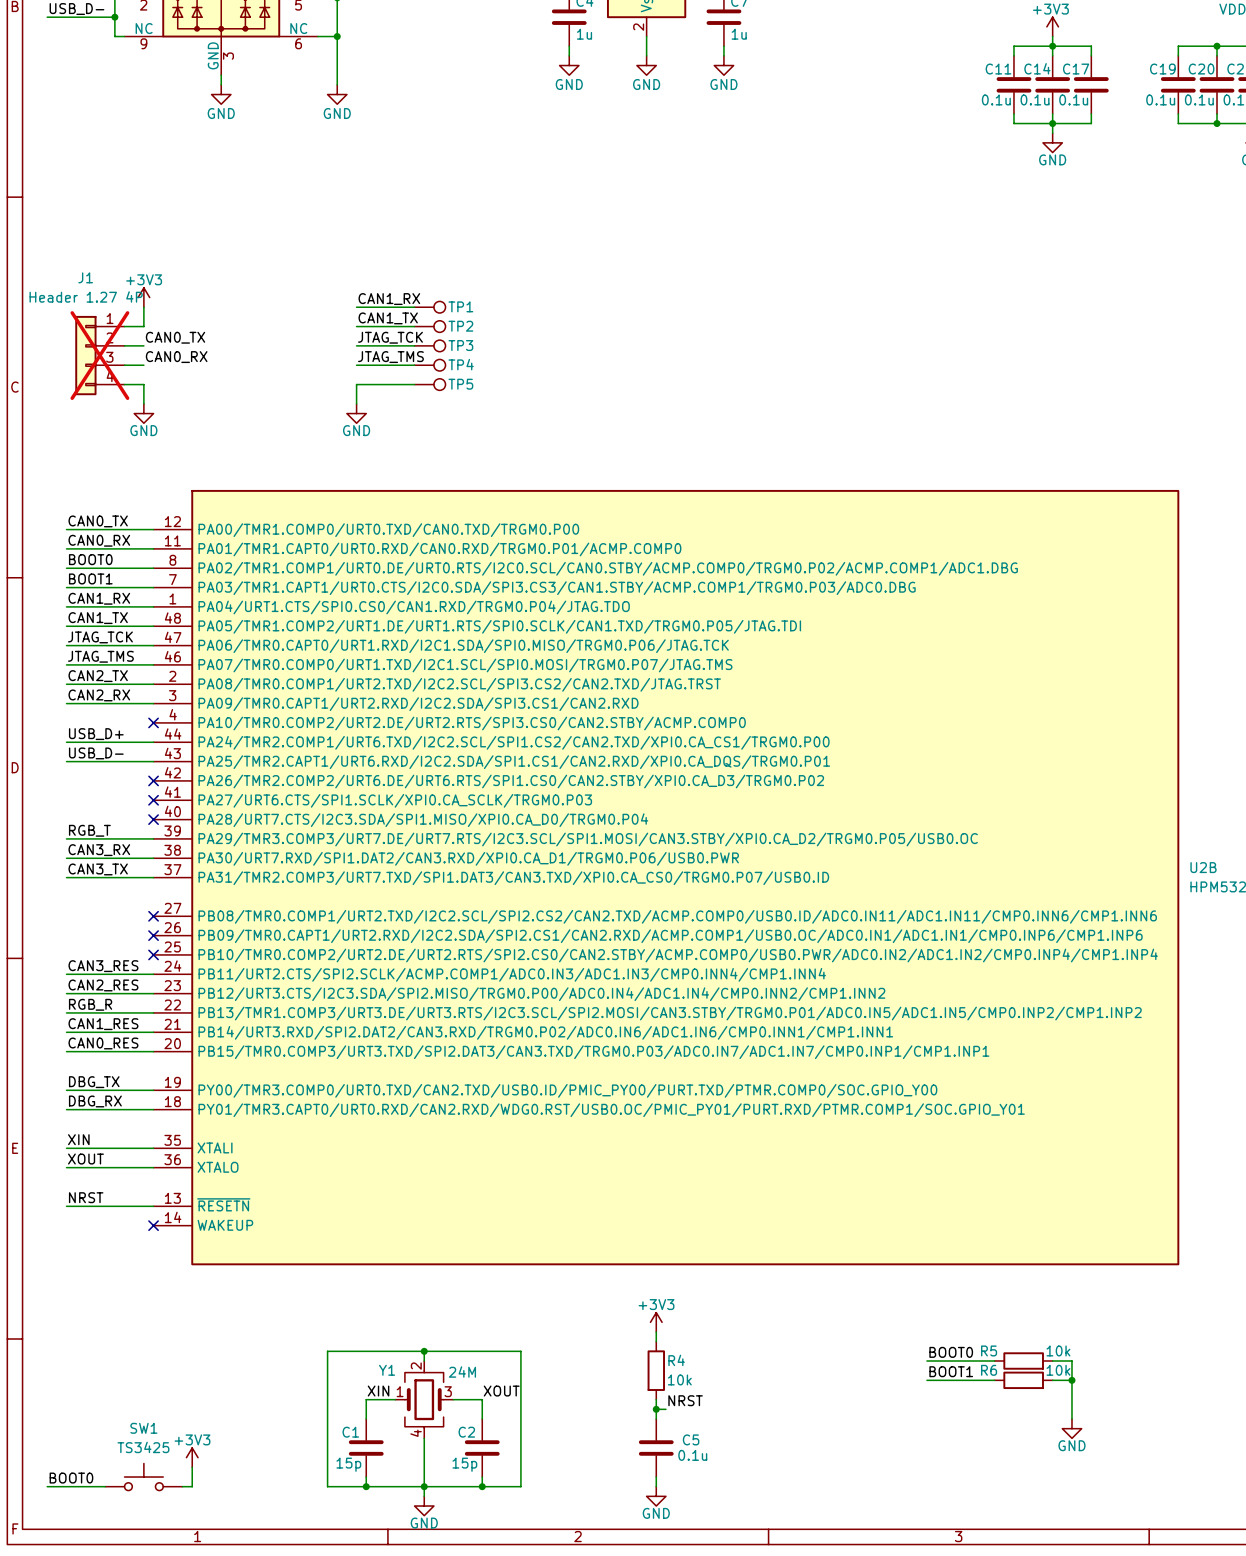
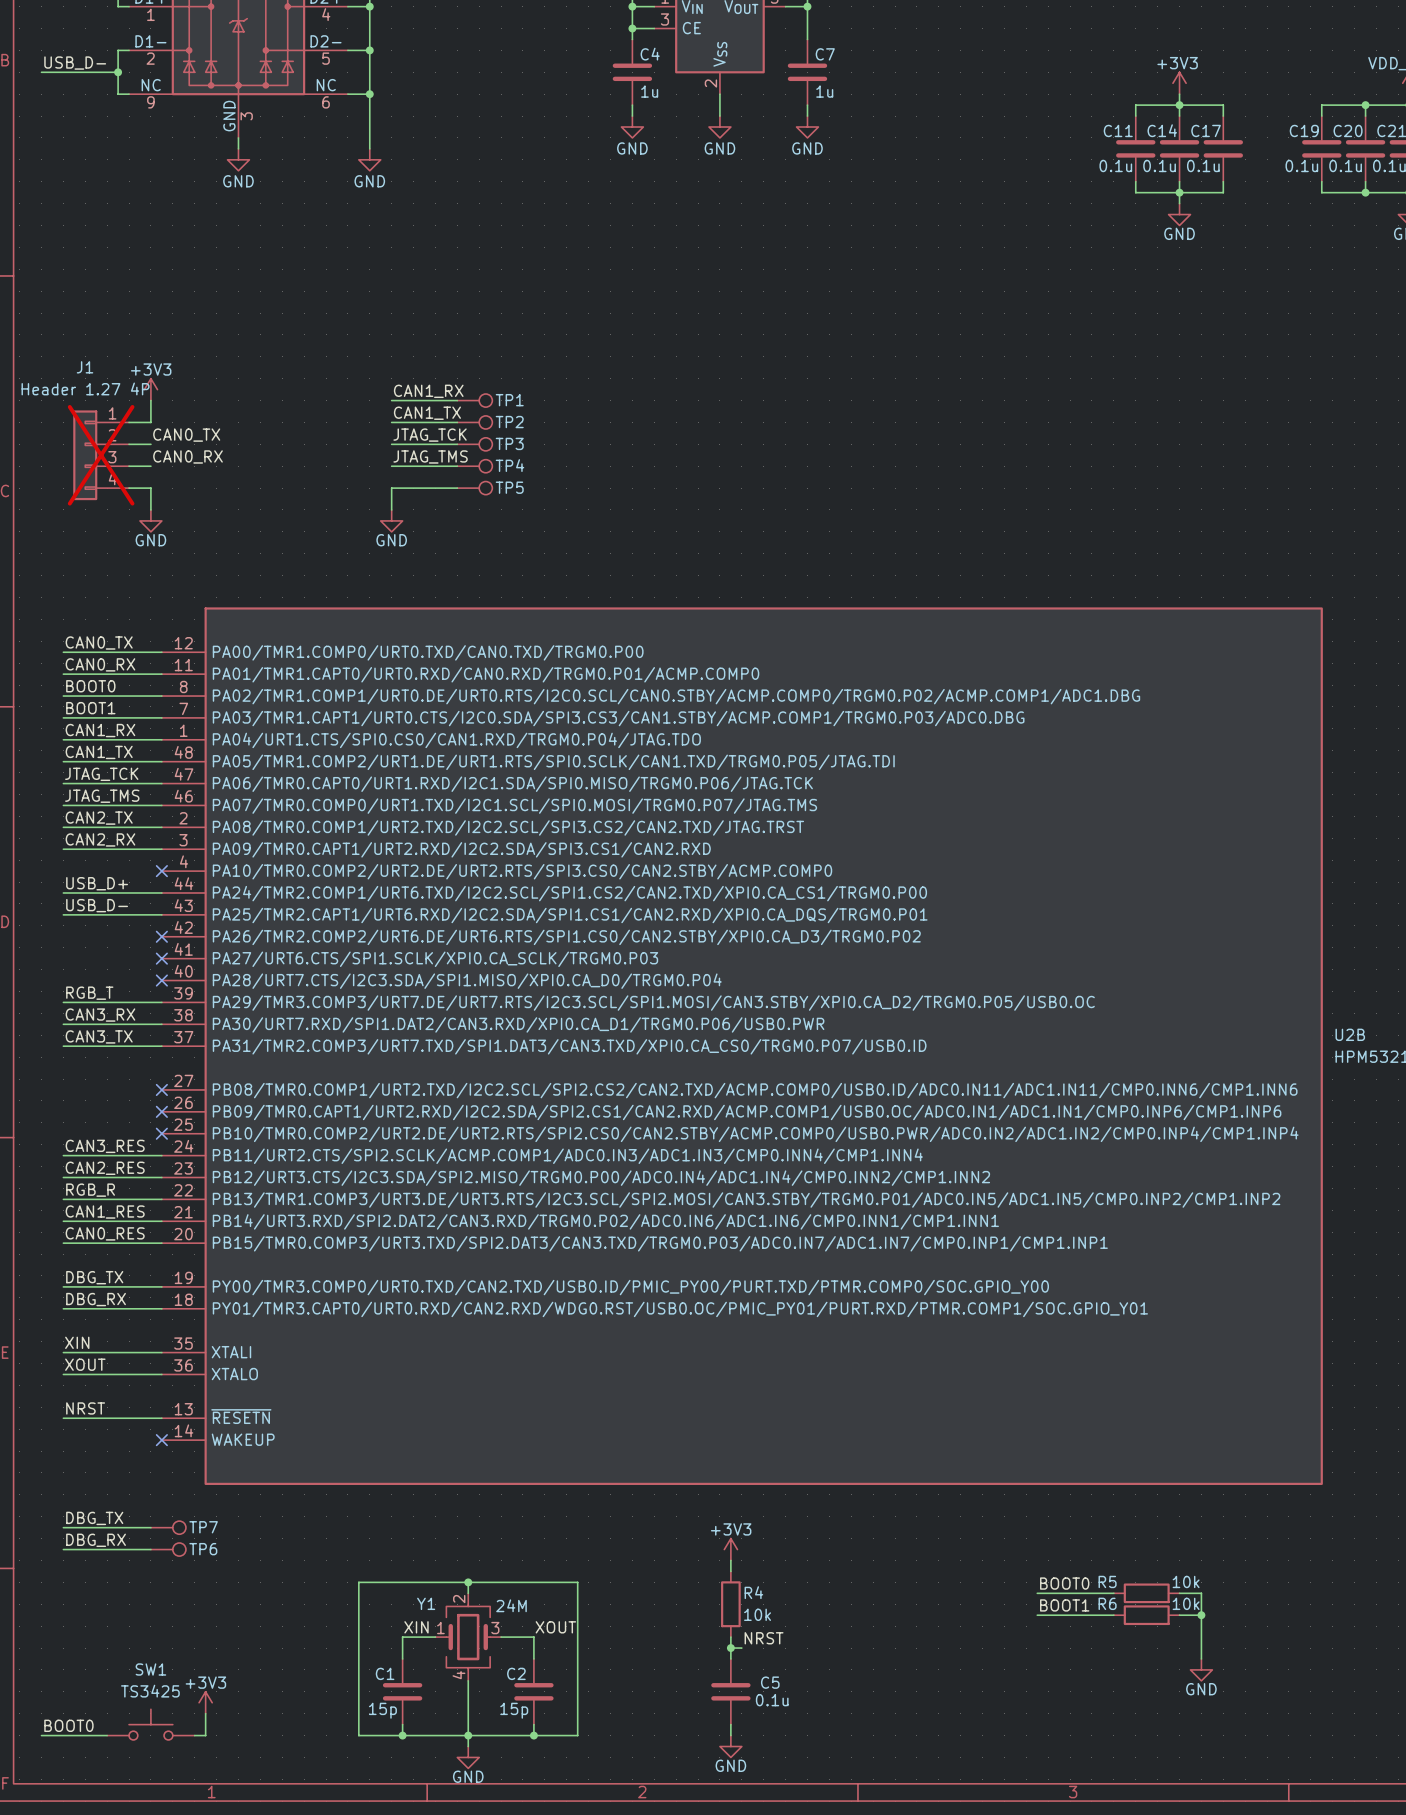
label: none -> DBG_TX (94, 1518)
wire: none -> (63, 1527) (150, 1527)
TP7: none -> (168, 1527)
label: none -> DBG_RX (96, 1540)
wire: none -> (63, 1549) (150, 1549)
TP6: none -> (168, 1549)

